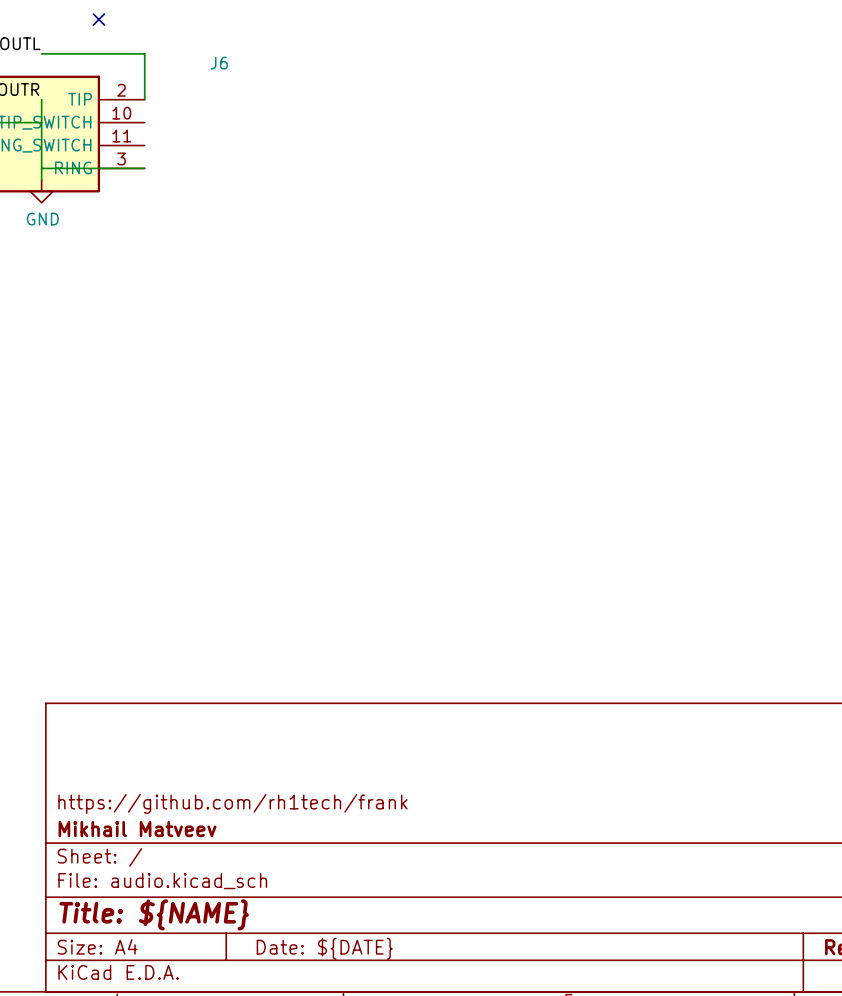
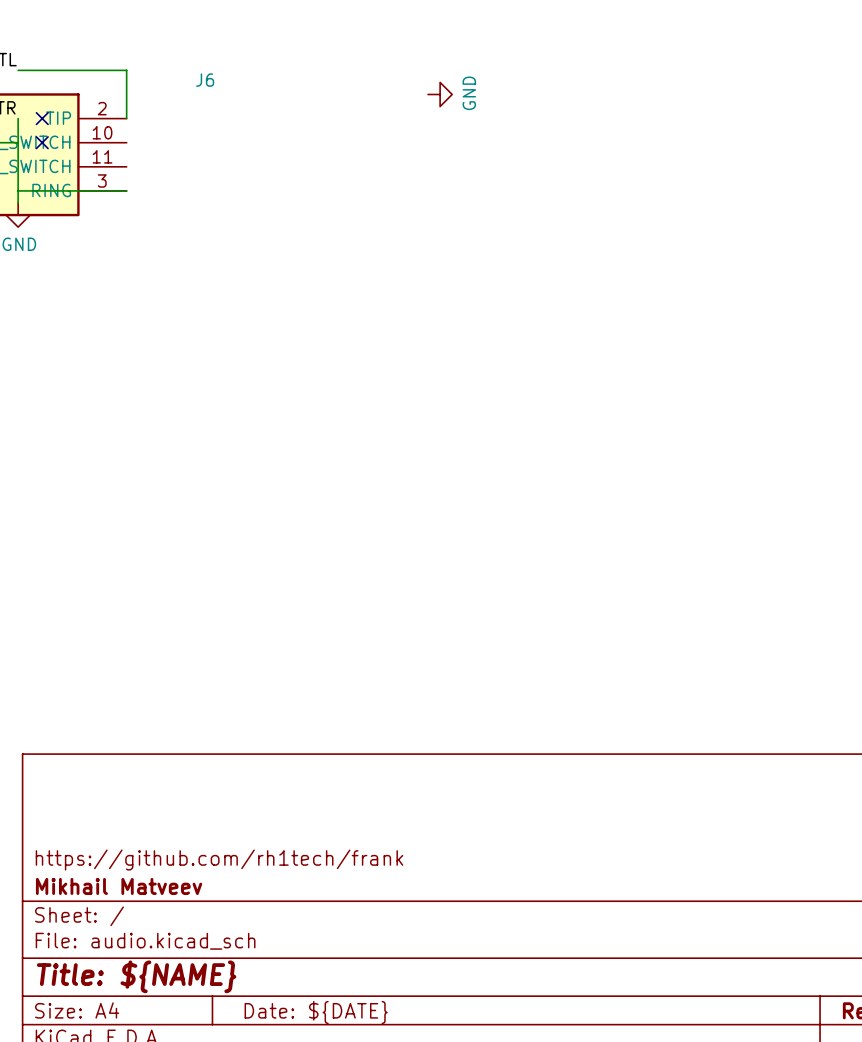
no-connect mark: (98, 19) -> none
power symbol: none -> GND (440, 94)
no-connect mark: none -> (42, 118)
no-connect mark: none -> (42, 142)

